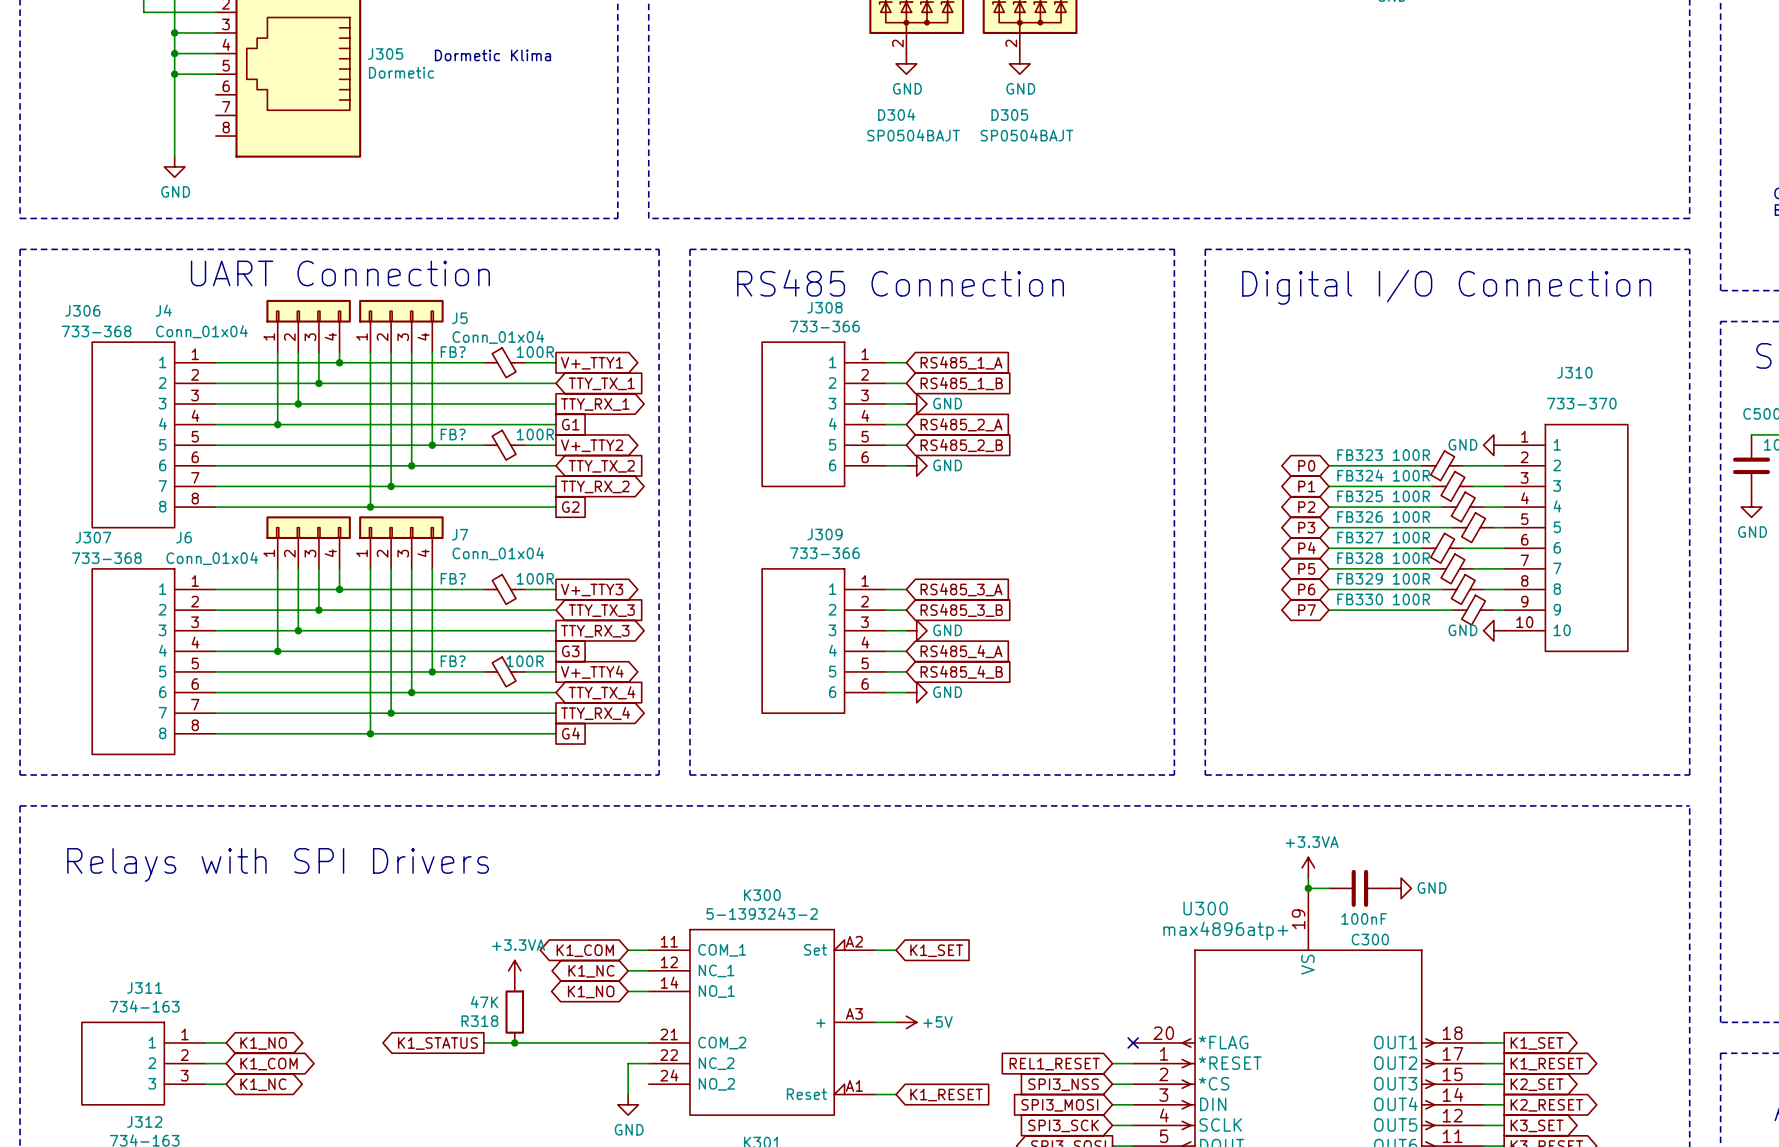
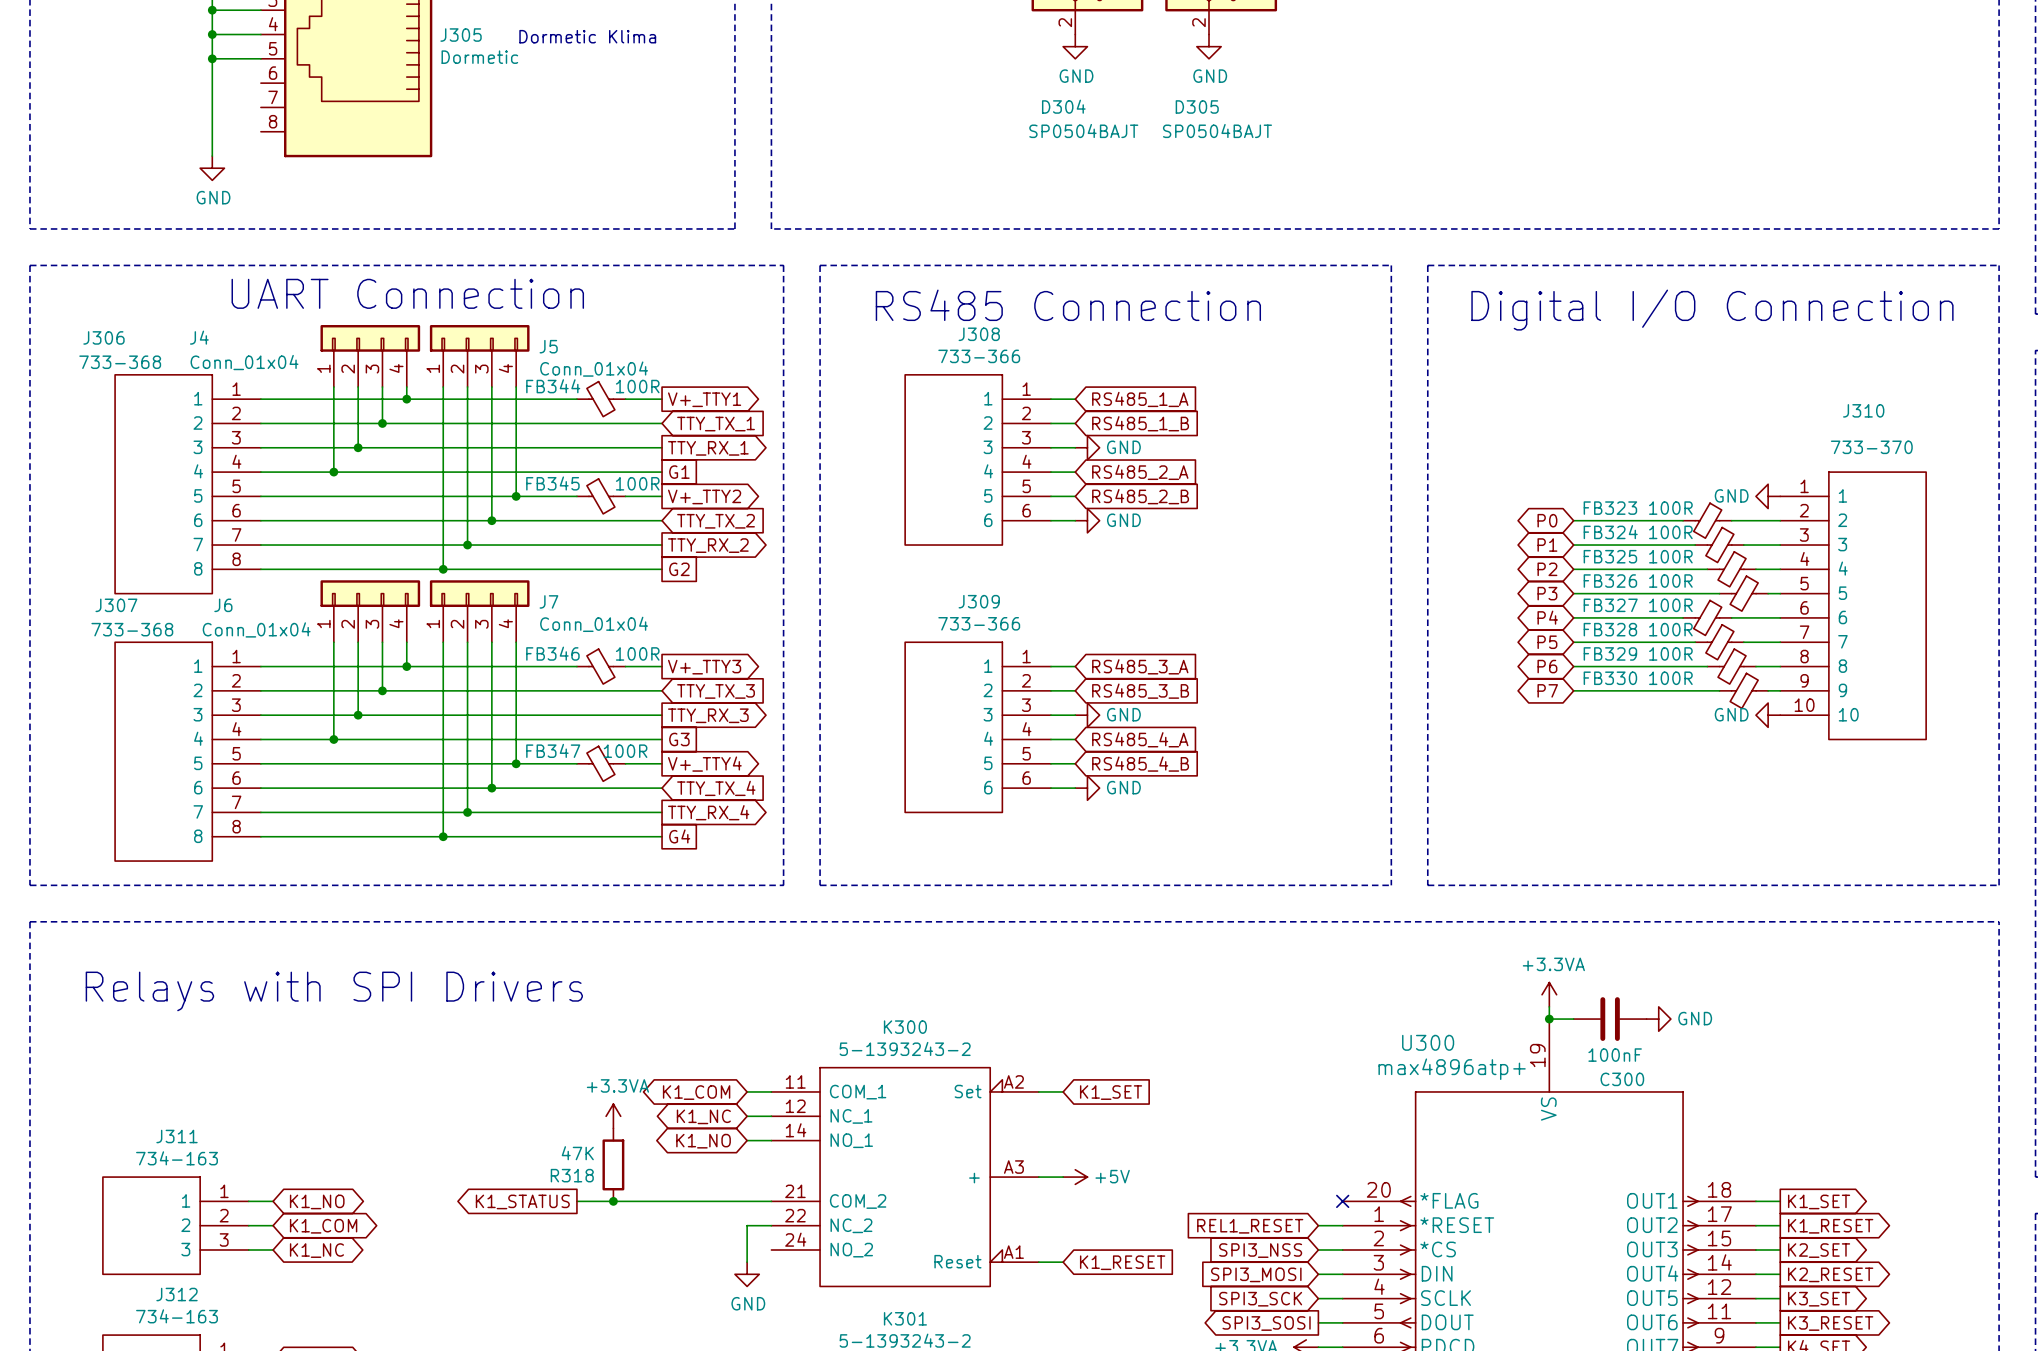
FB? name: FB? (453, 352) -> FB344 (553, 386)
FB? name: FB? (453, 434) -> FB345 (552, 483)
FB? name: FB? (453, 578) -> FB346 (552, 653)
FB? name: FB? (453, 661) -> FB347 (553, 750)

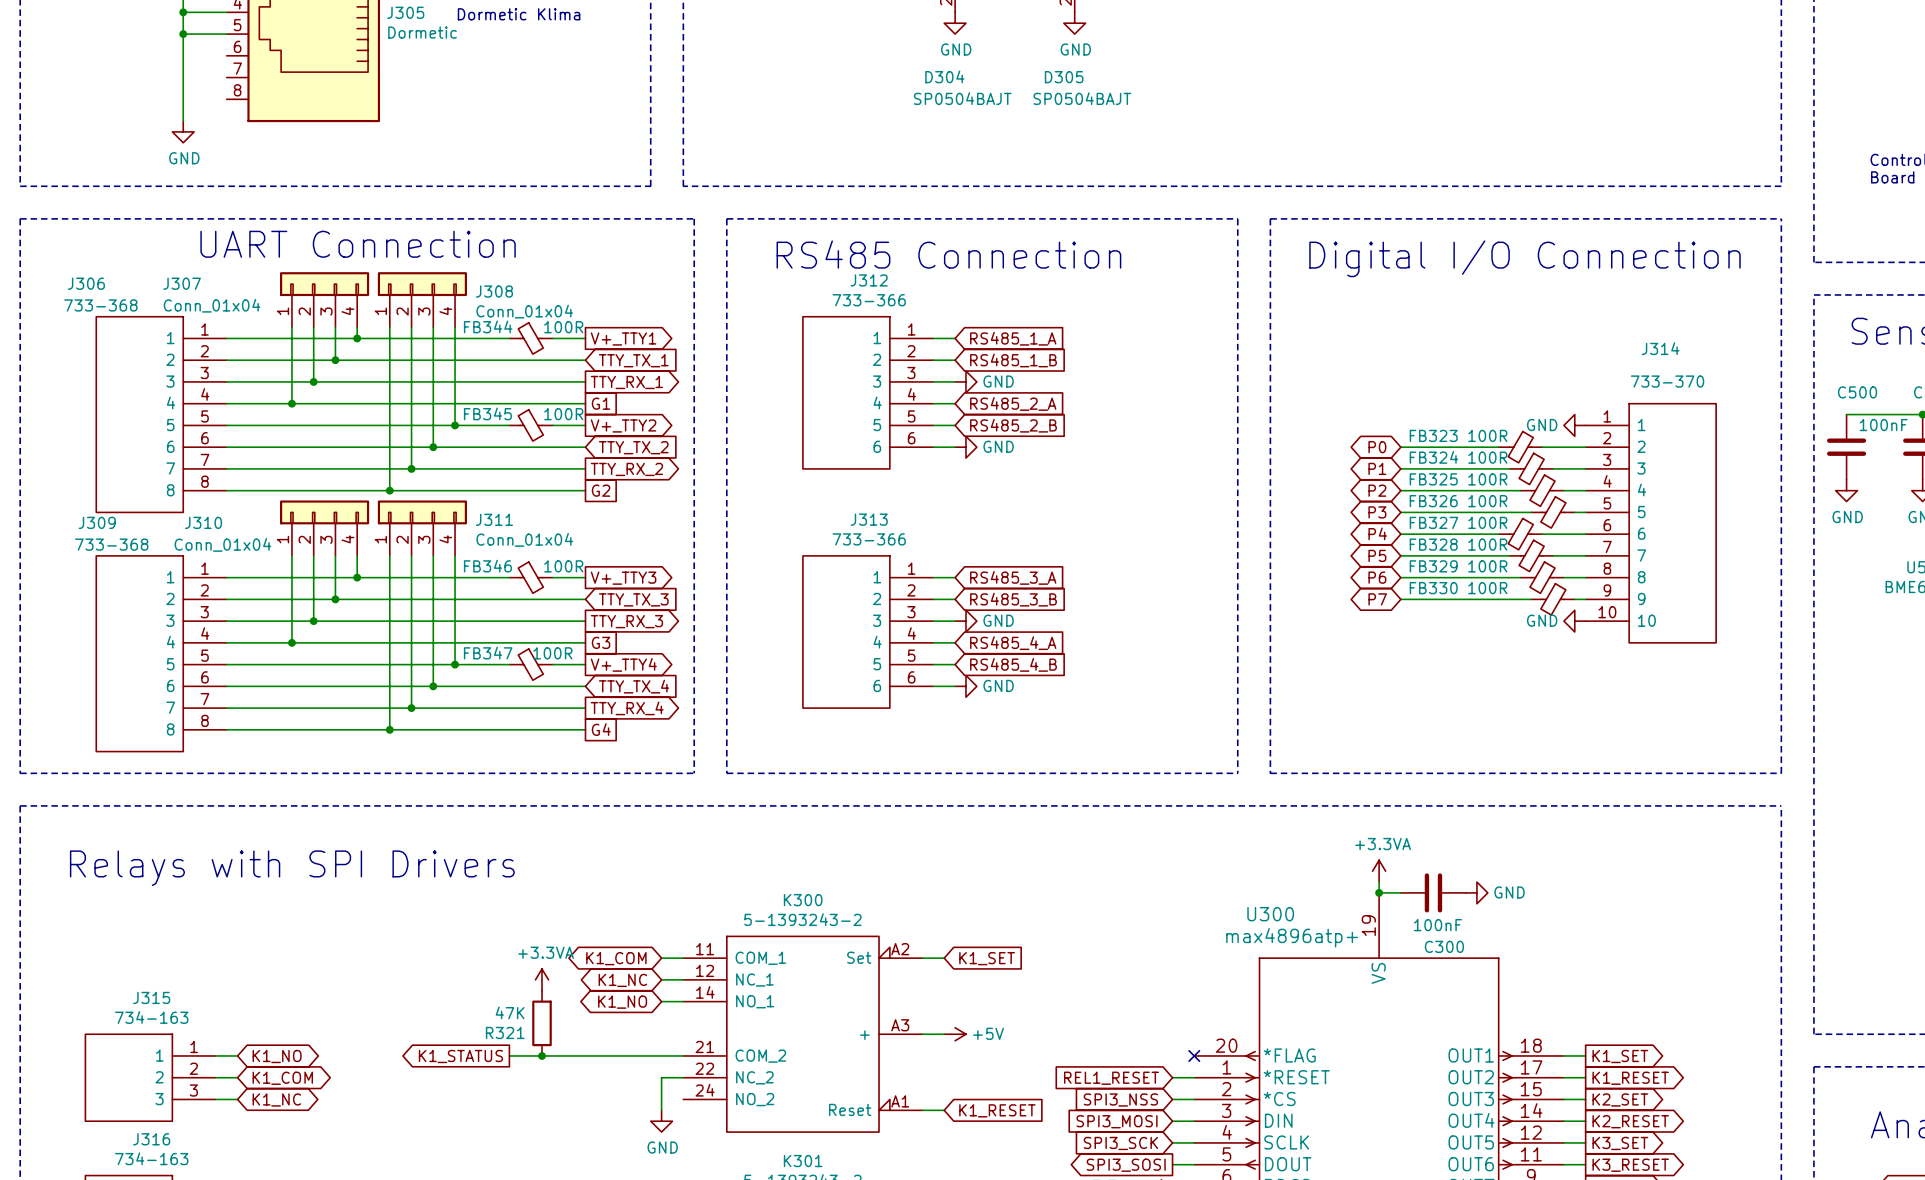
J308 name: J308 (979, 334) -> J312 (869, 280)
J4 name: J4 (199, 337) -> J307 (182, 283)
J5 name: J5 (548, 346) -> J308 (494, 291)
J310 name: J310 (1863, 410) -> J314 (1660, 348)
J7 name: J7 (548, 601) -> J311 (494, 519)
J309 name: J309 (979, 601) -> J313 (869, 519)
J307 name: J307 (116, 605) -> J309 (97, 522)
J6 name: J6 (223, 605) -> J310 (203, 522)
J311 name: J311 (177, 1136) -> J315 (151, 997)
R318 name: R318 (572, 1175) -> R321 (505, 1032)
J312 name: J312 (177, 1294) -> J316 (151, 1139)

